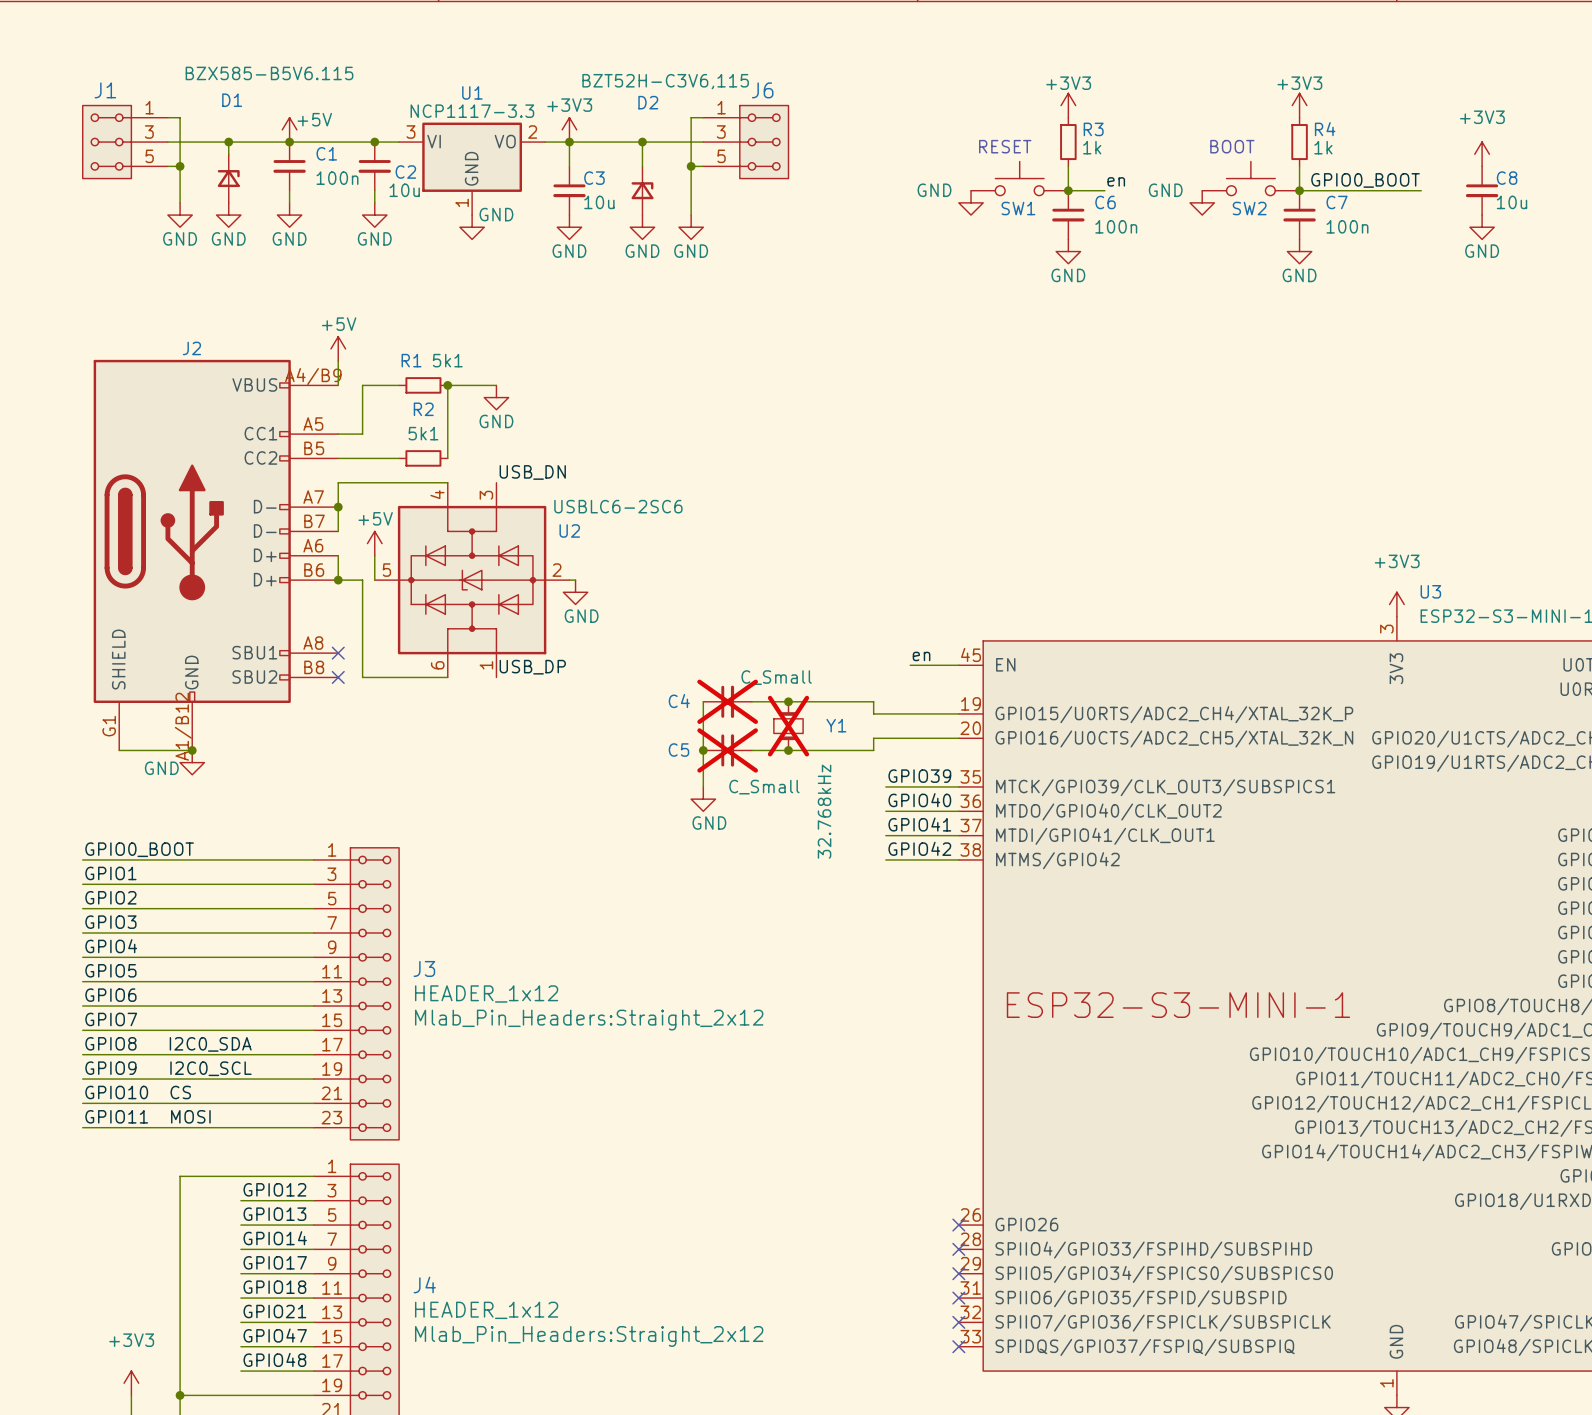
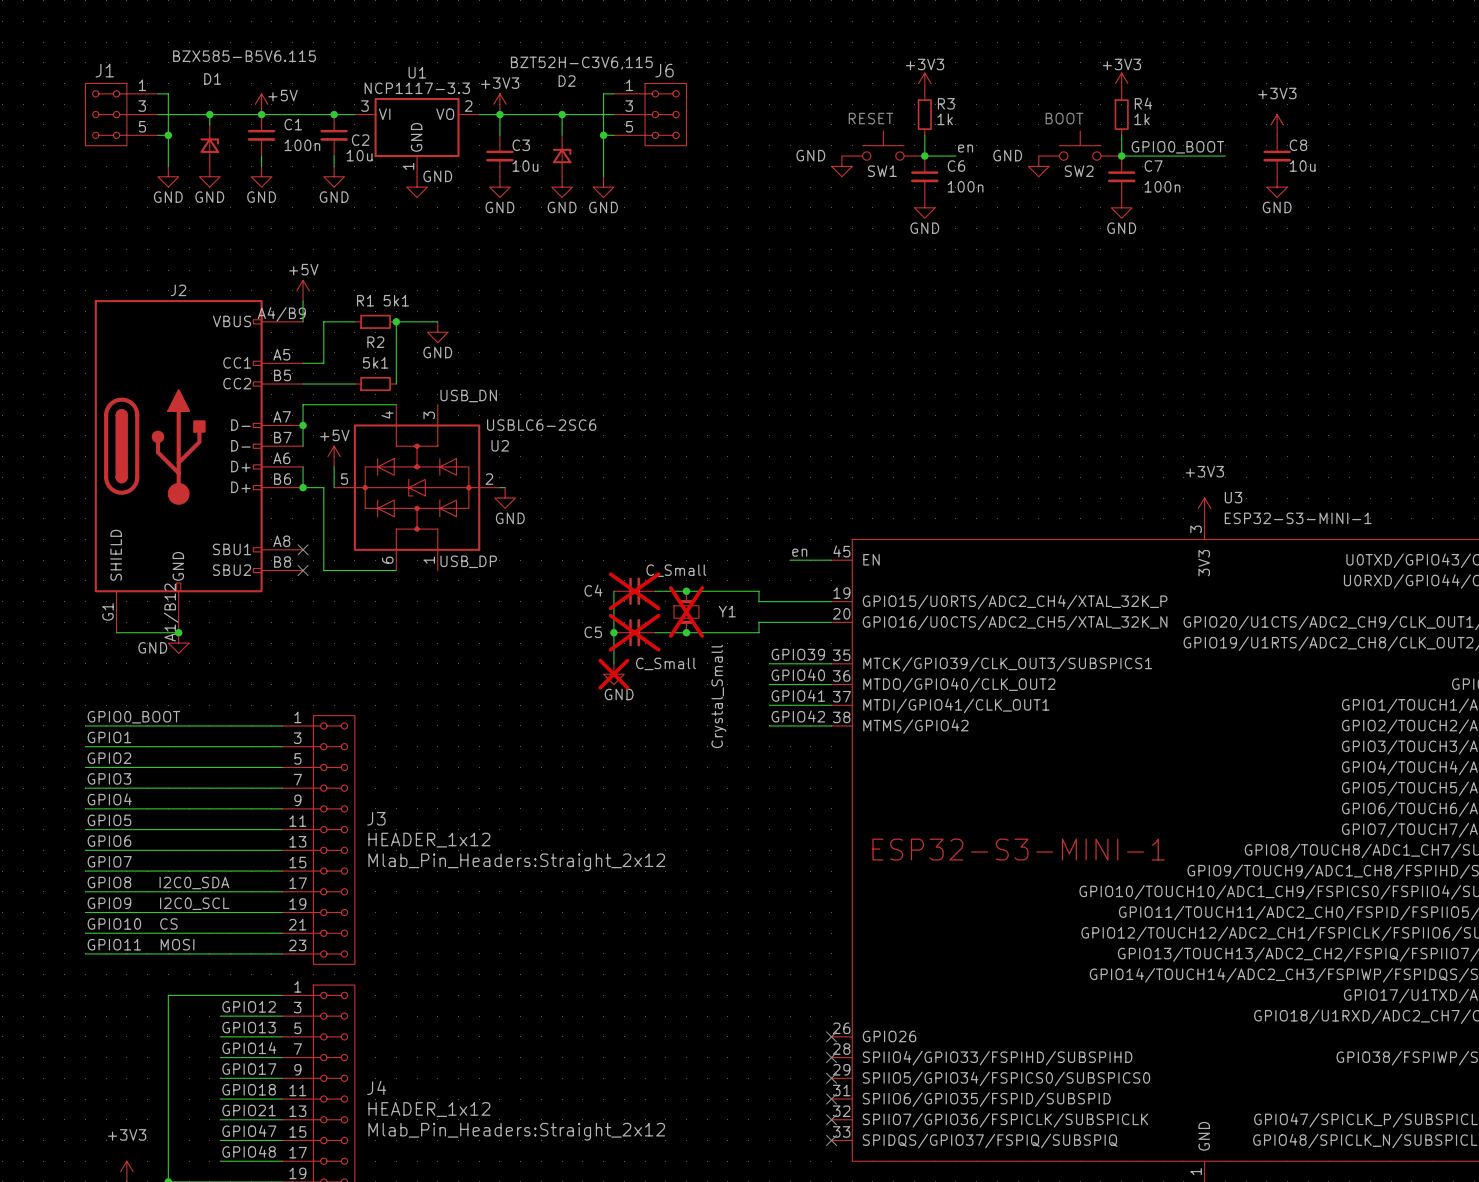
power symbol do-not-place cross: none -> (613, 674)
Y1 value: 32.768kHz (824, 811) -> Crystal_Small (718, 696)

